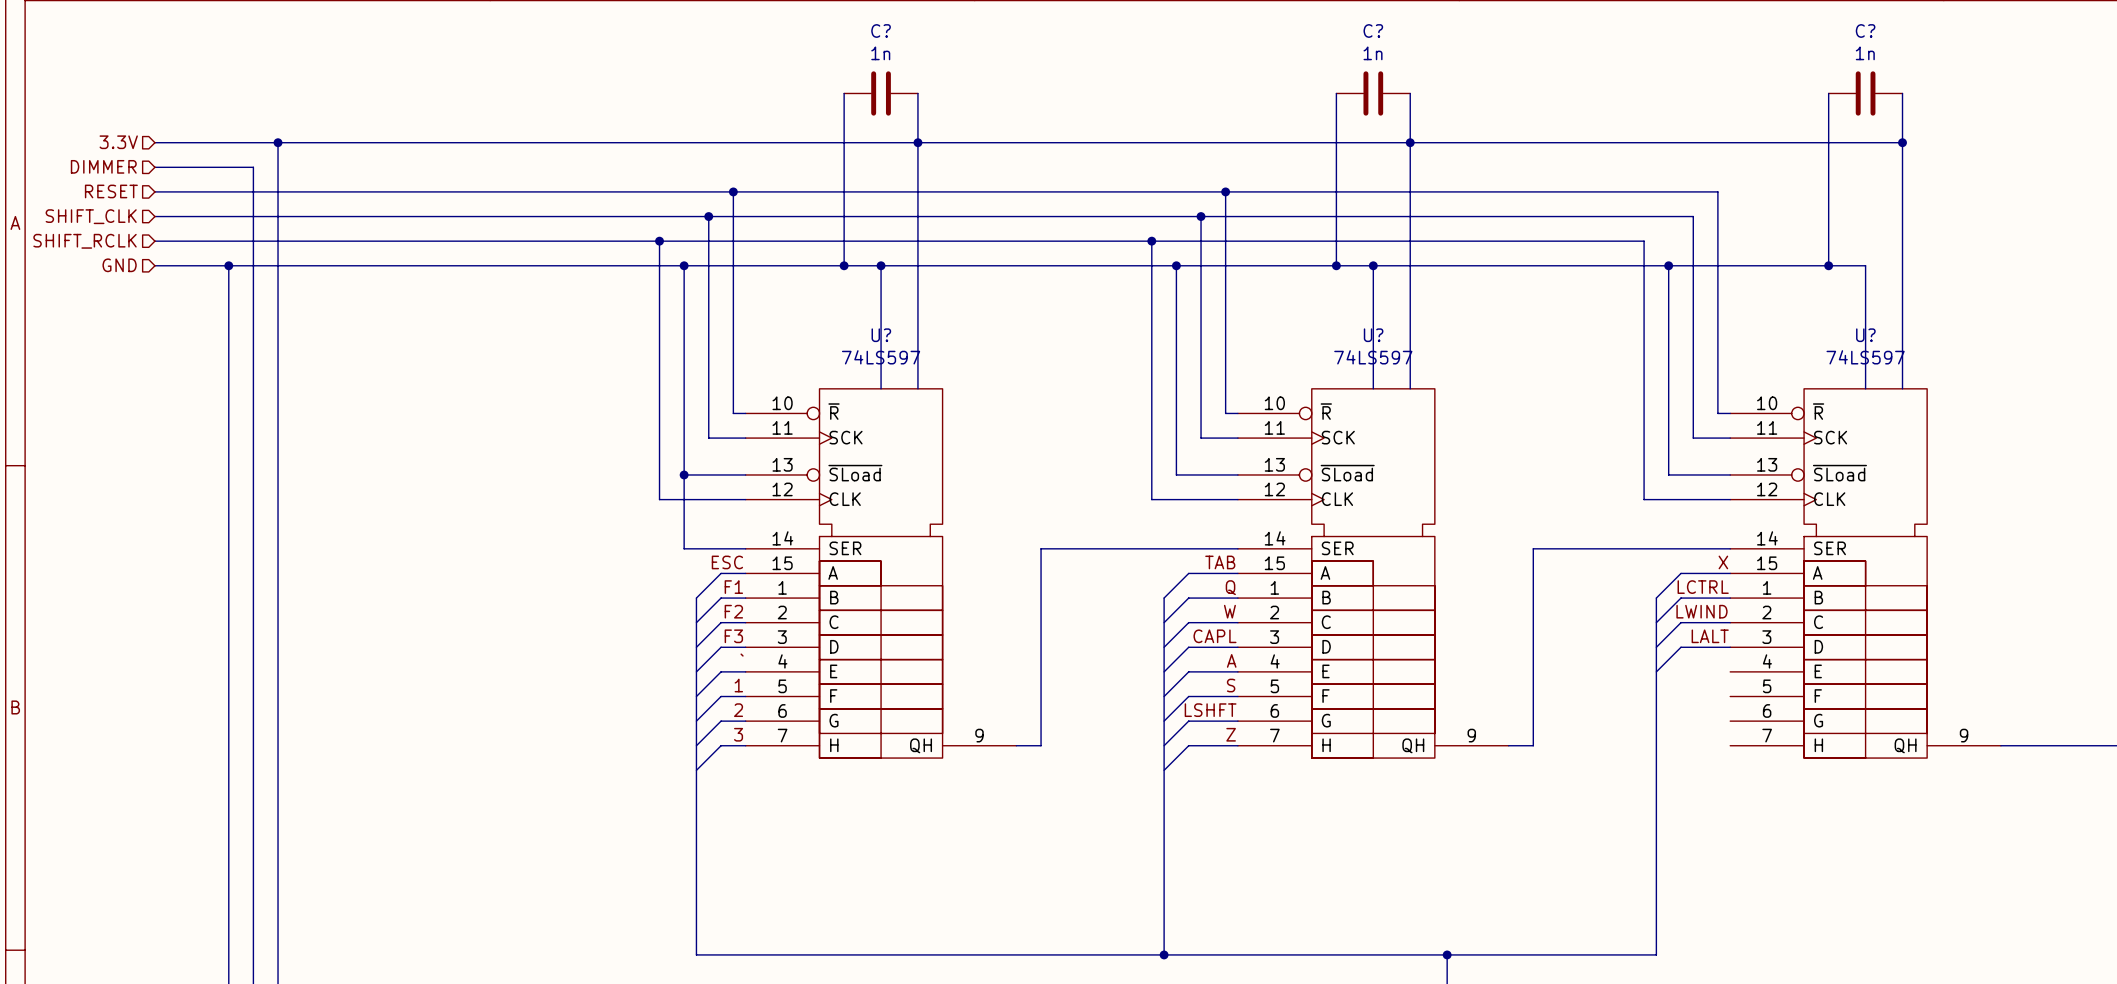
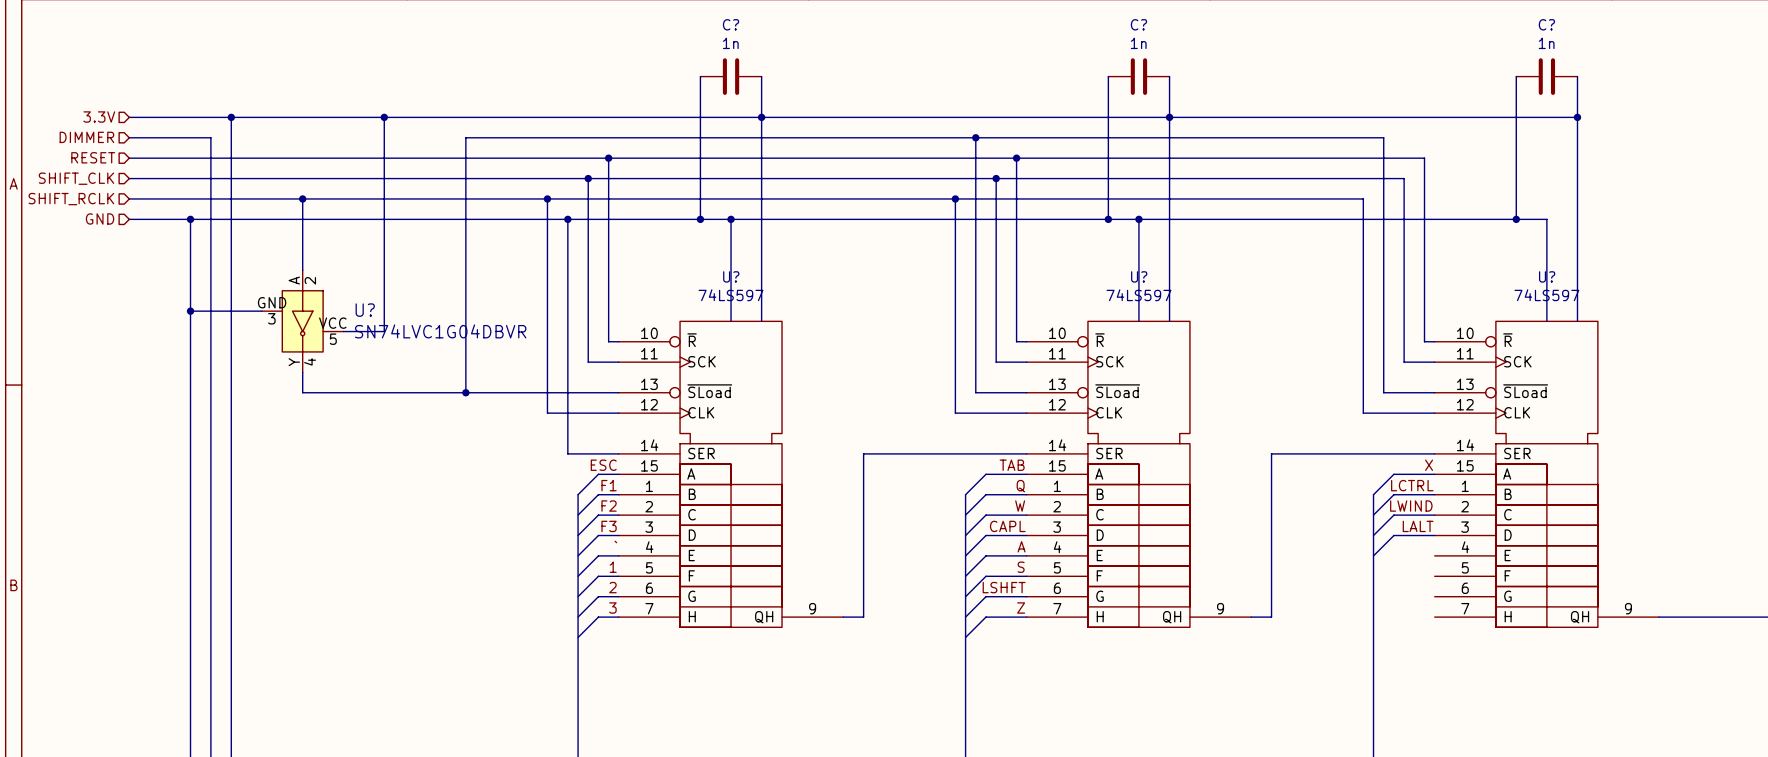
wire: none -> (384, 117) (384, 331) (343, 331)
junction: none -> (384, 117)
wire: none -> (975, 137) (975, 219)
junction: none -> (975, 137)
wire: none -> (302, 198) (302, 270)
junction: none -> (302, 198)
junction: (1176, 265) -> none
wire: none -> (1383, 219) (1383, 137) (465, 137) (465, 392)
junction: (1668, 265) -> none
wire: none -> (190, 311) (261, 311)
junction: none -> (190, 311)
U?: none -> SN74LVC1G04DBVR (302, 321)
wire: none -> (302, 372) (302, 392) (567, 392)
junction: none -> (465, 392)
junction: (684, 474) -> none

